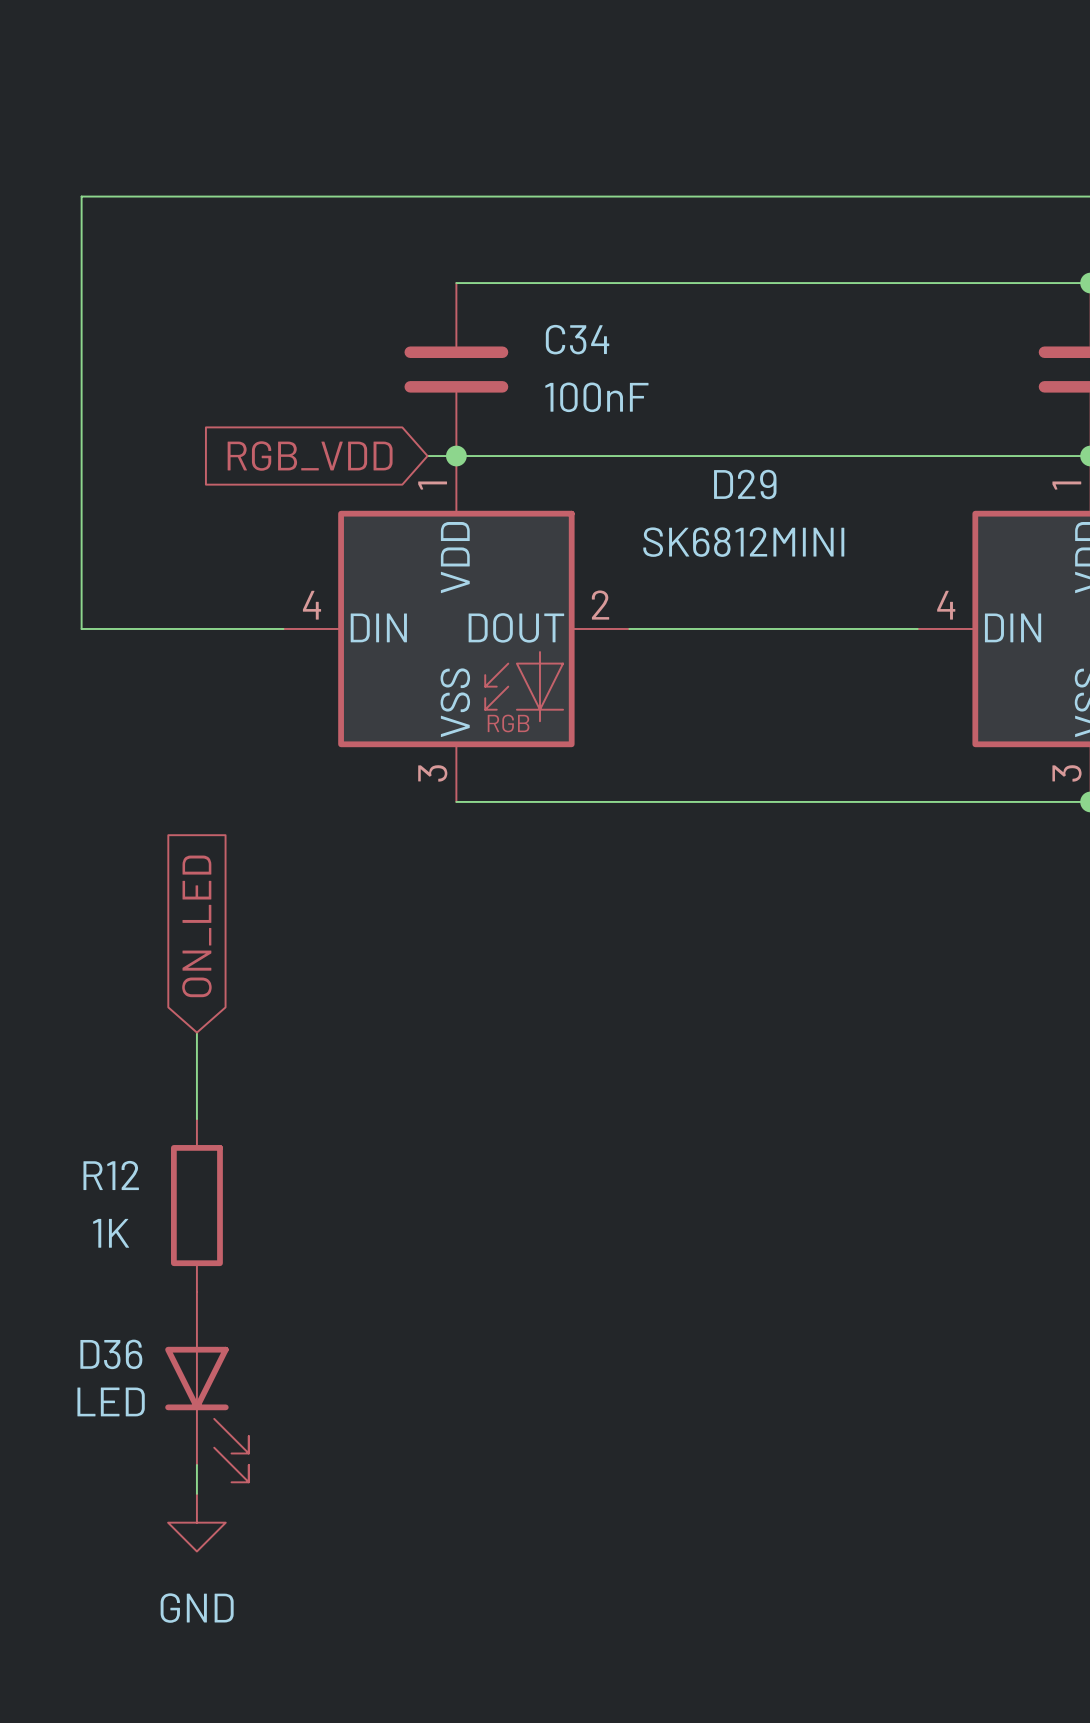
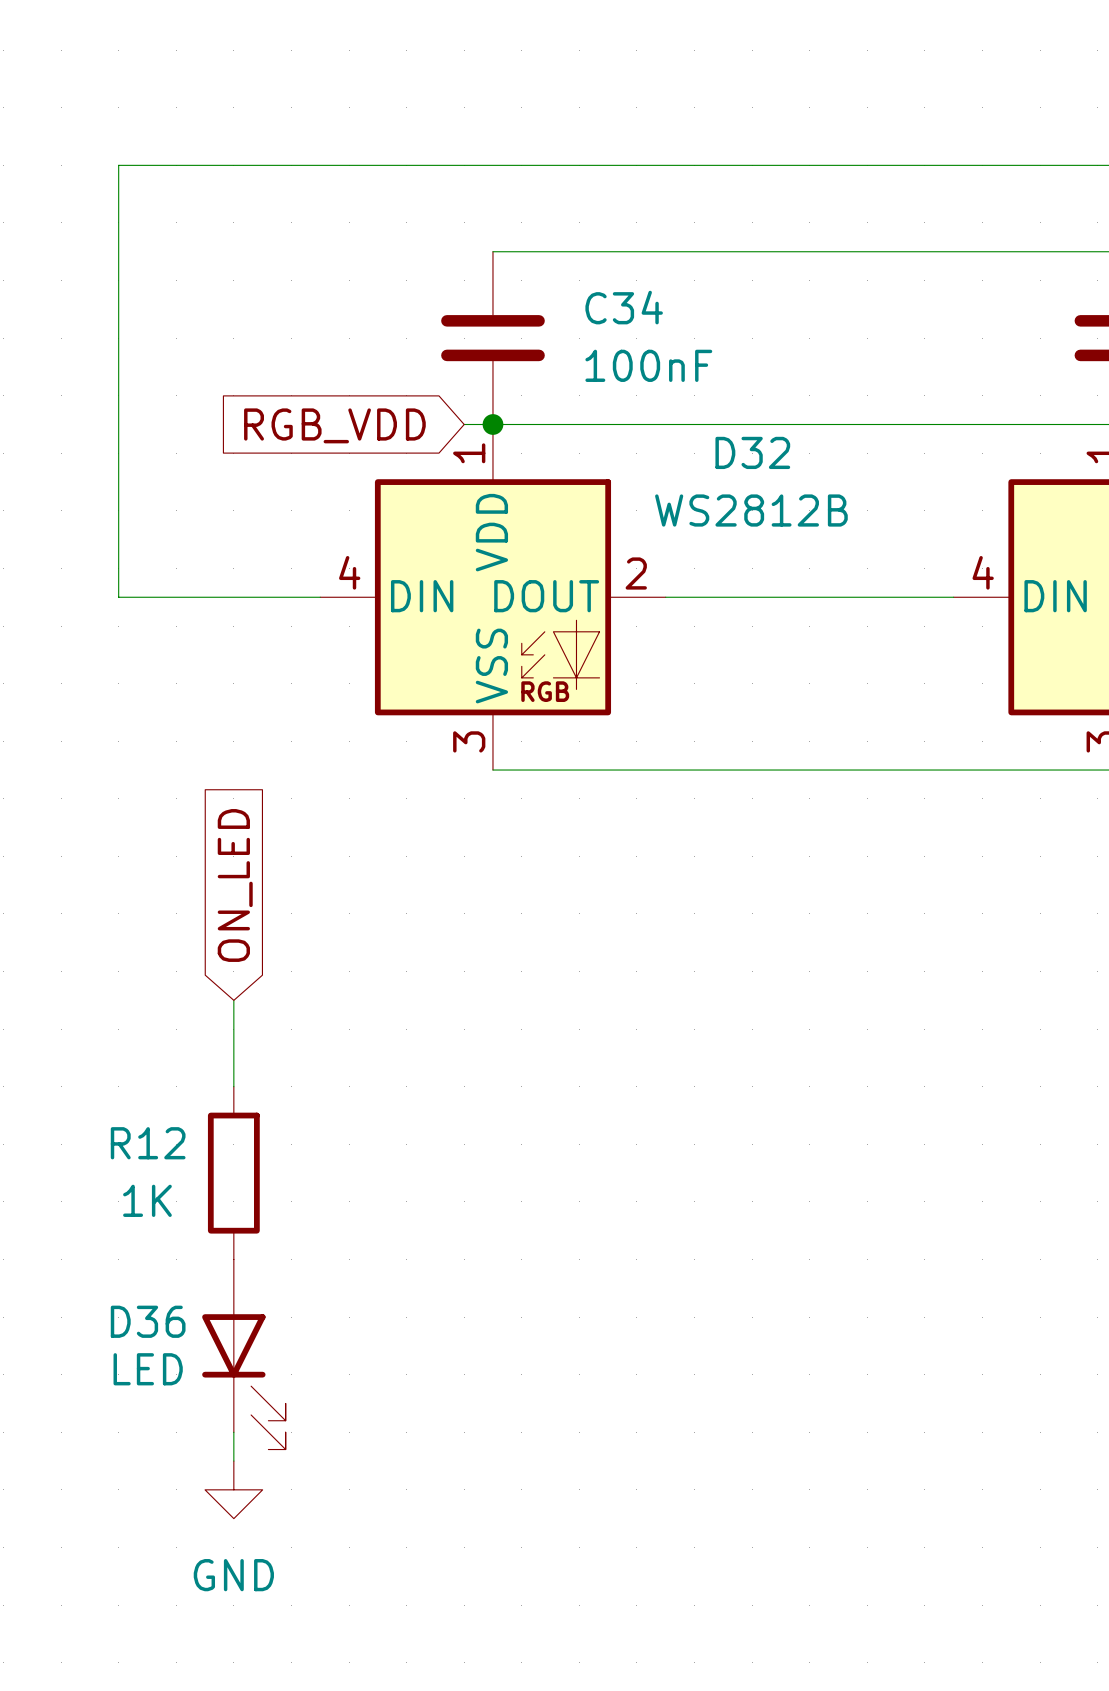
D29 name: D29 (745, 484) -> D32 (752, 452)
D29 value: SK6812MINI (743, 542) -> WS2812B (751, 510)

